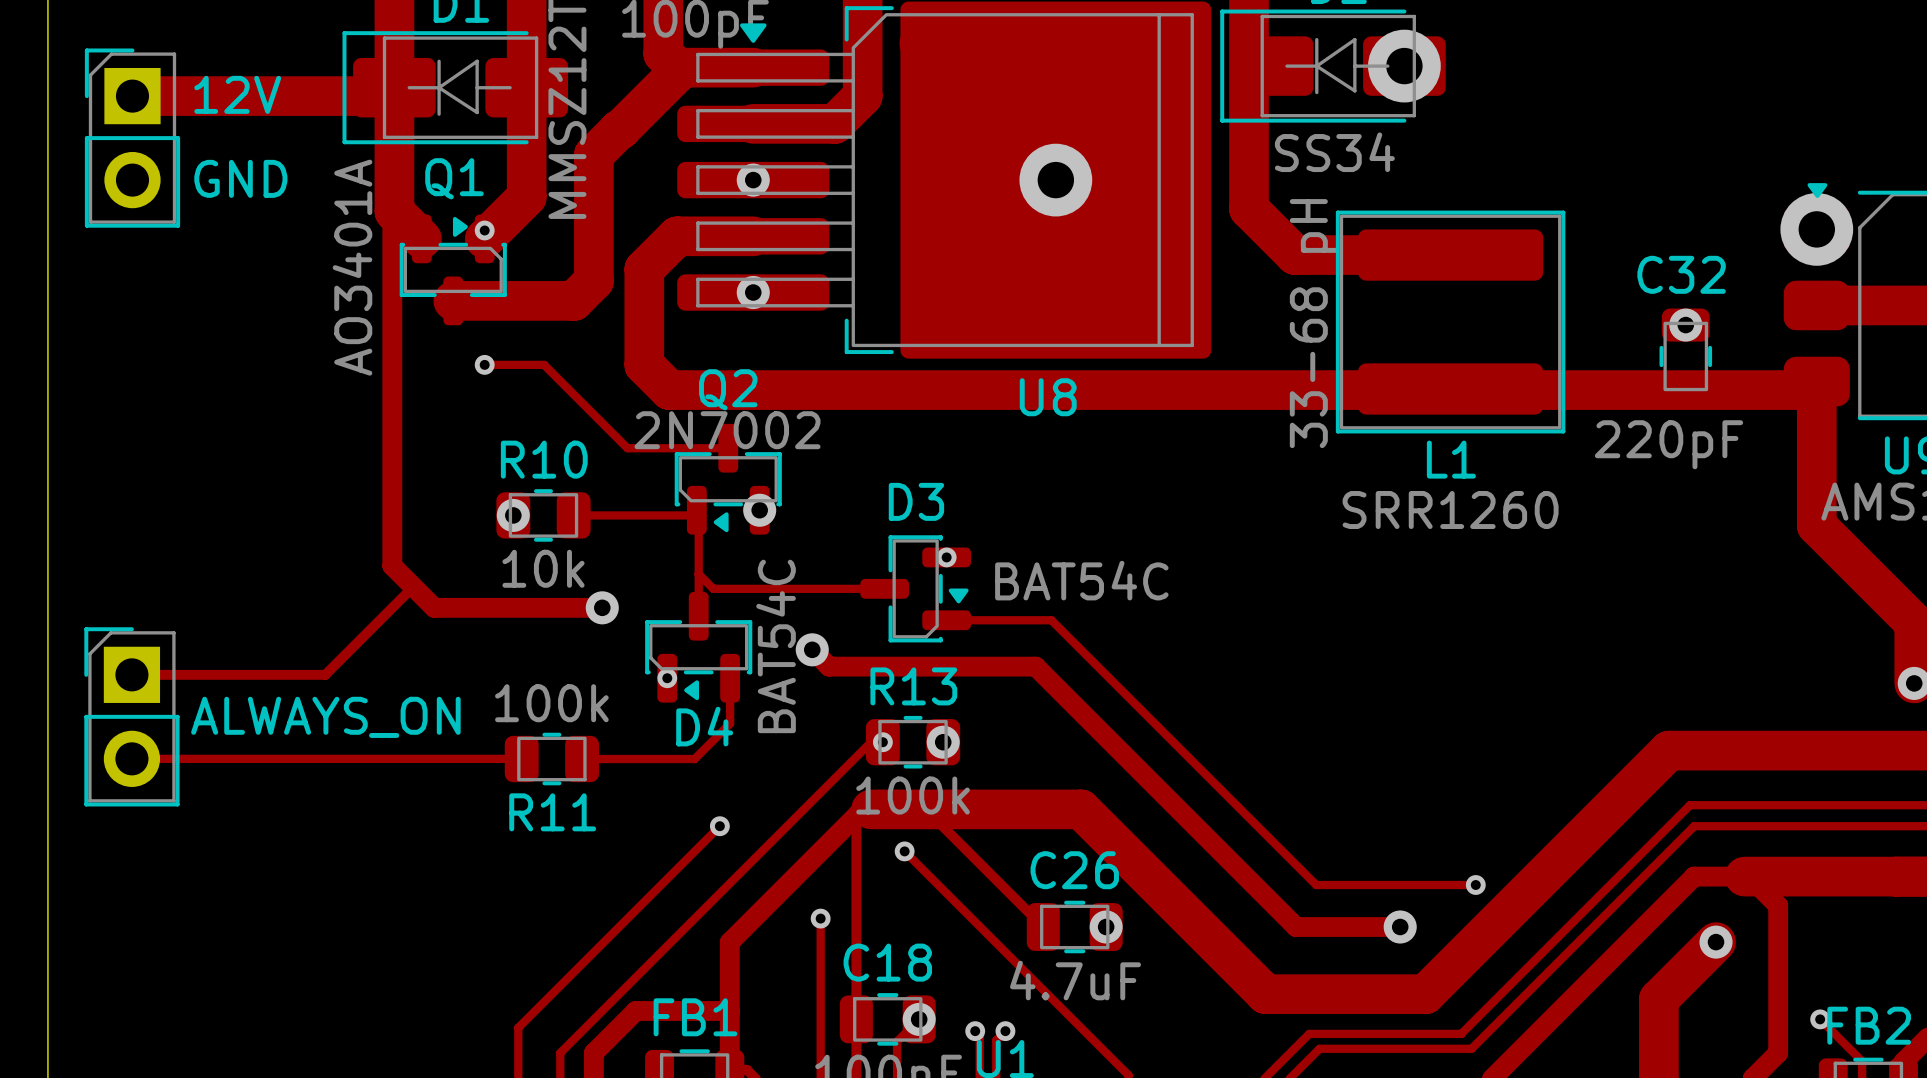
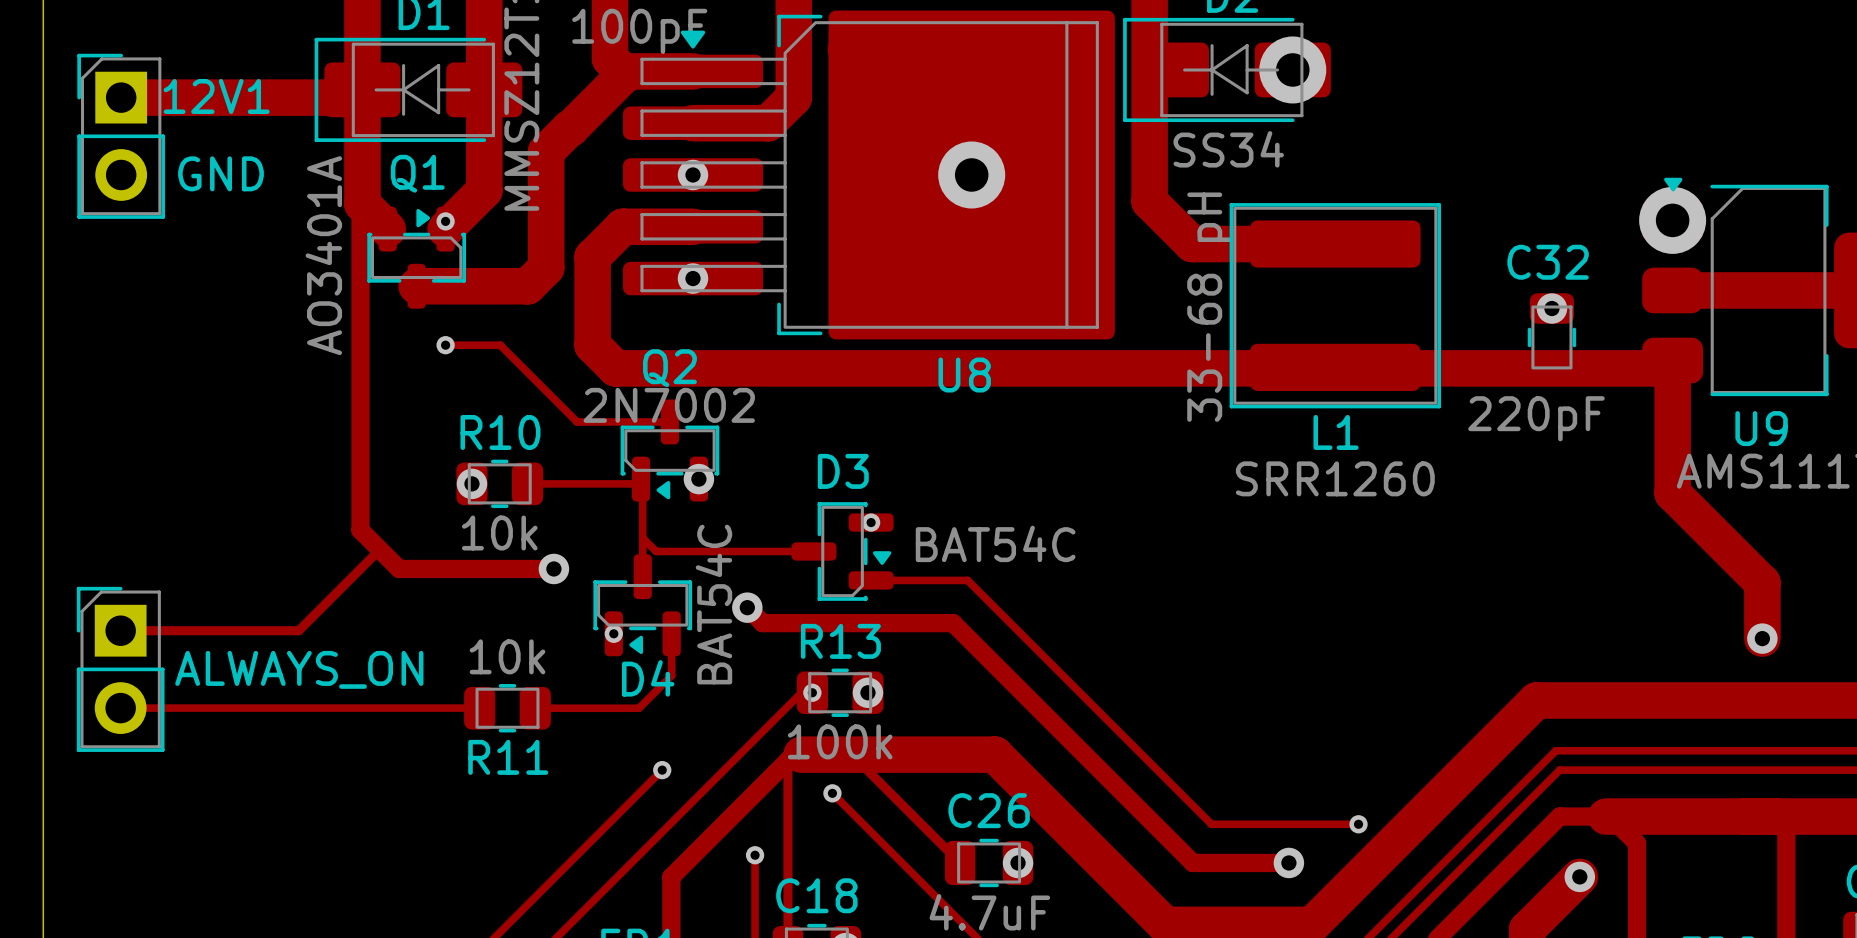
12V name: 12V (237, 94) -> 12V1 (216, 96)
R11 value: 100k (551, 703) -> 10k (507, 656)

